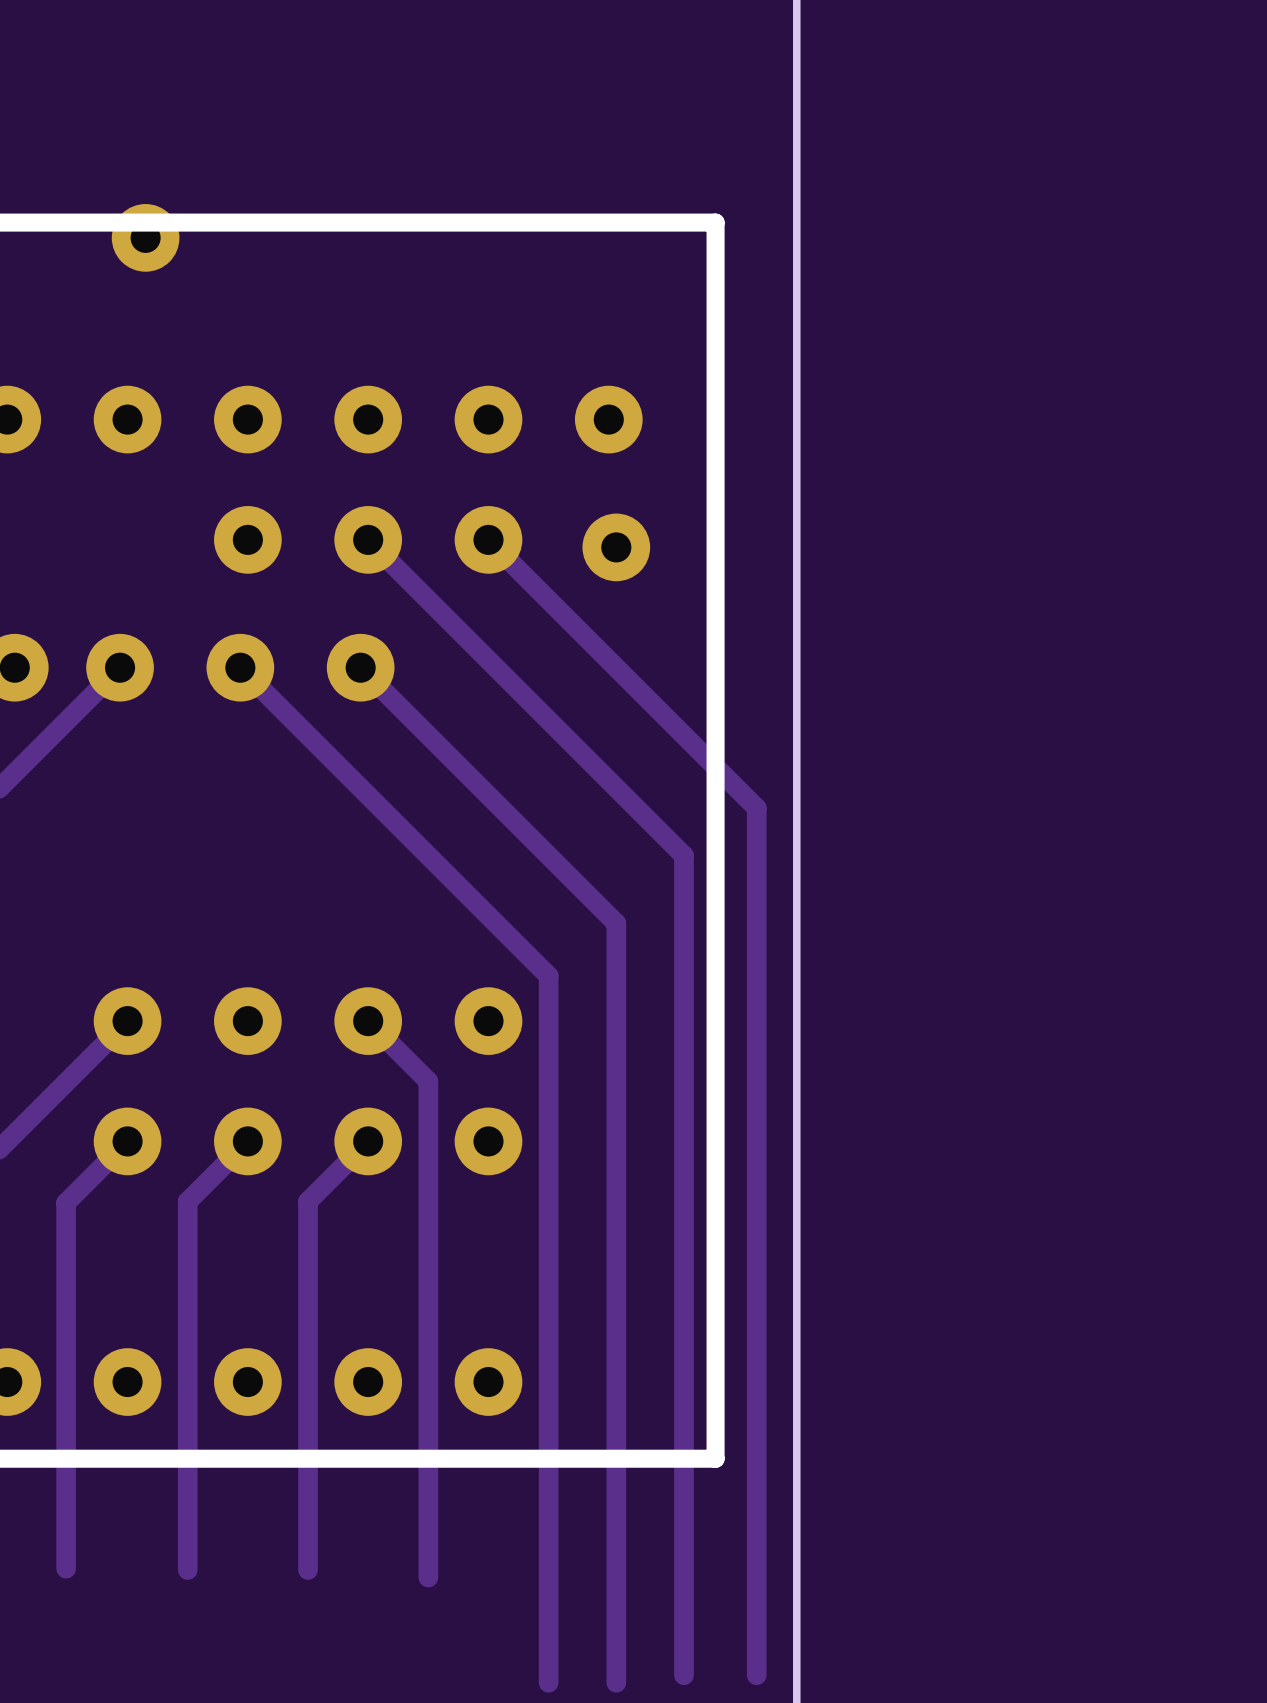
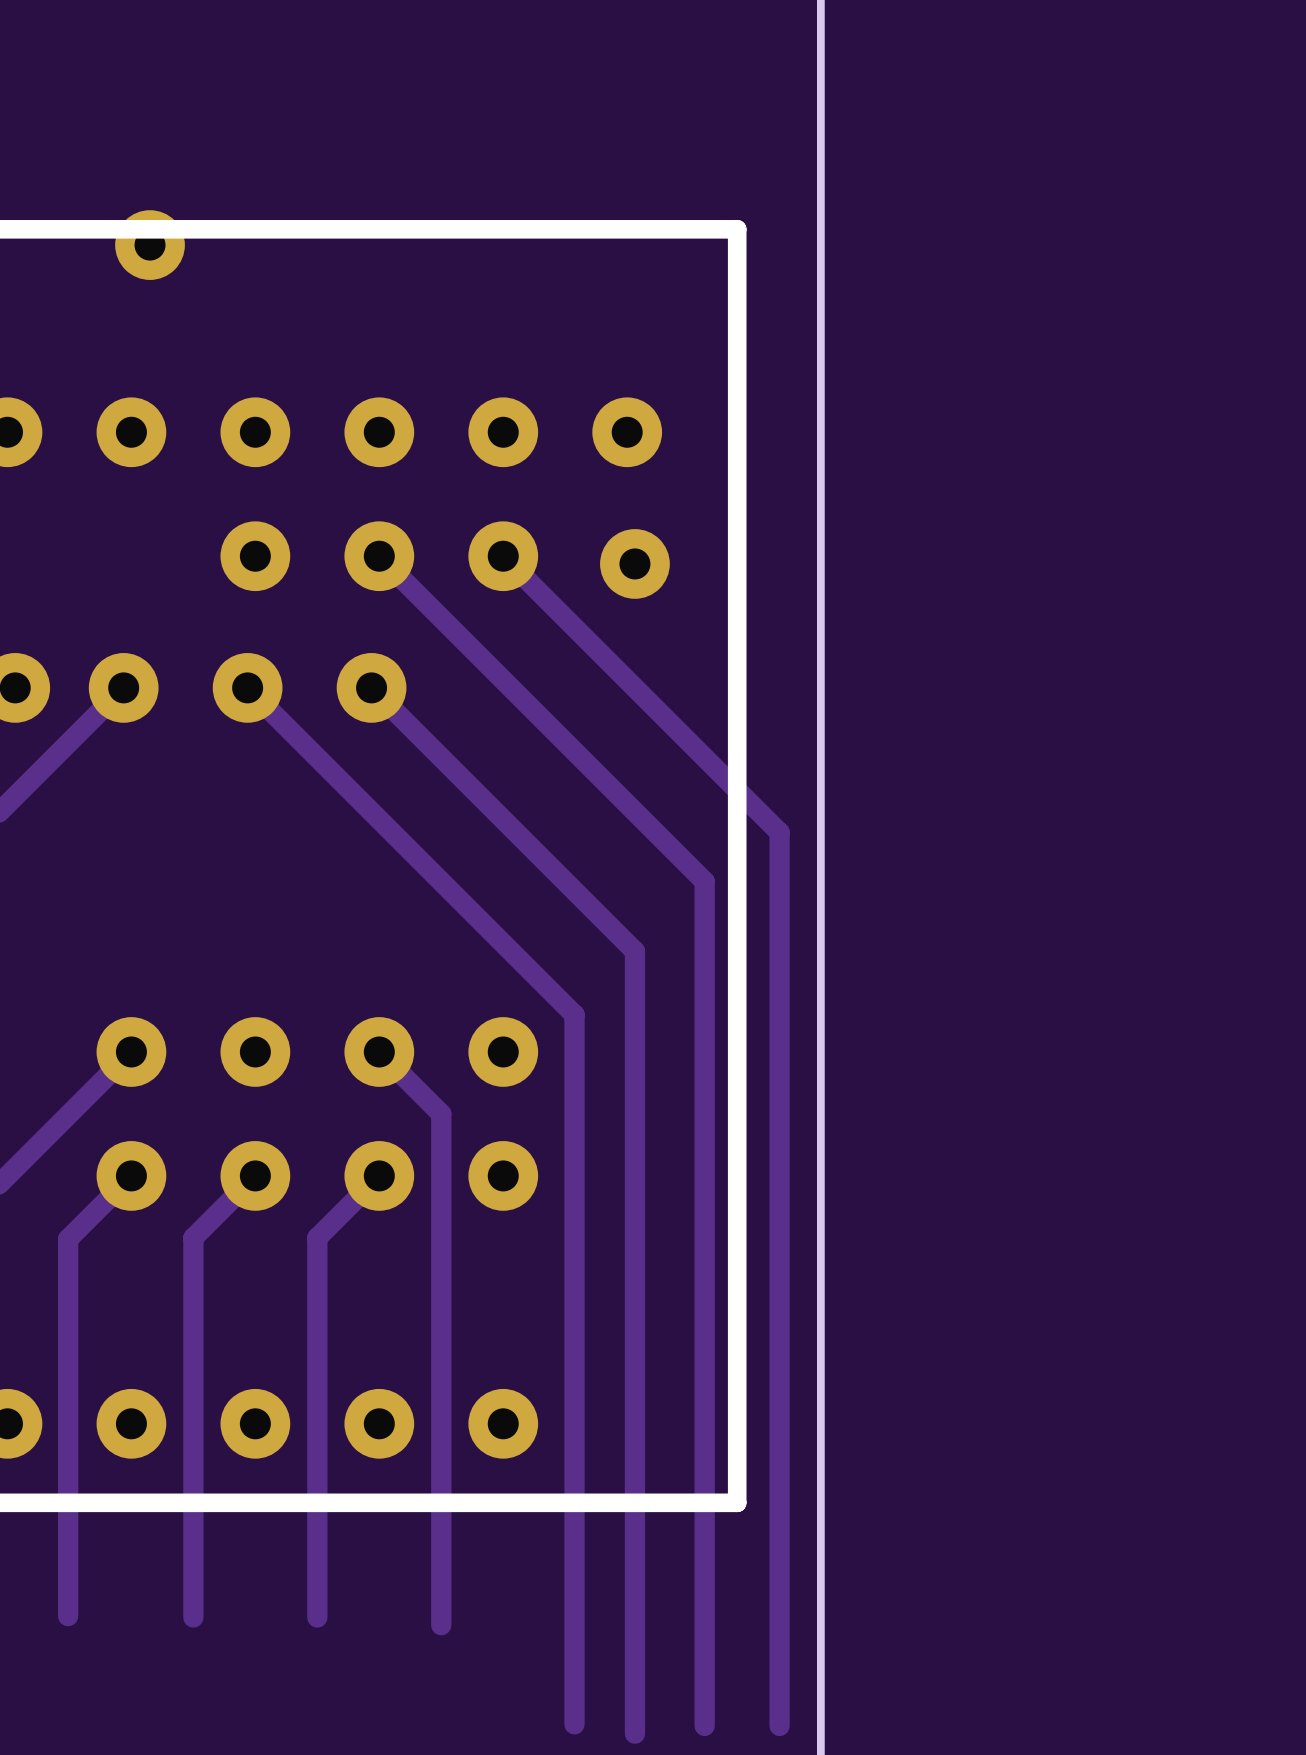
track: (548, 975) (548, 1682) -> (565, 1005) (574, 1014) (574, 1724)

